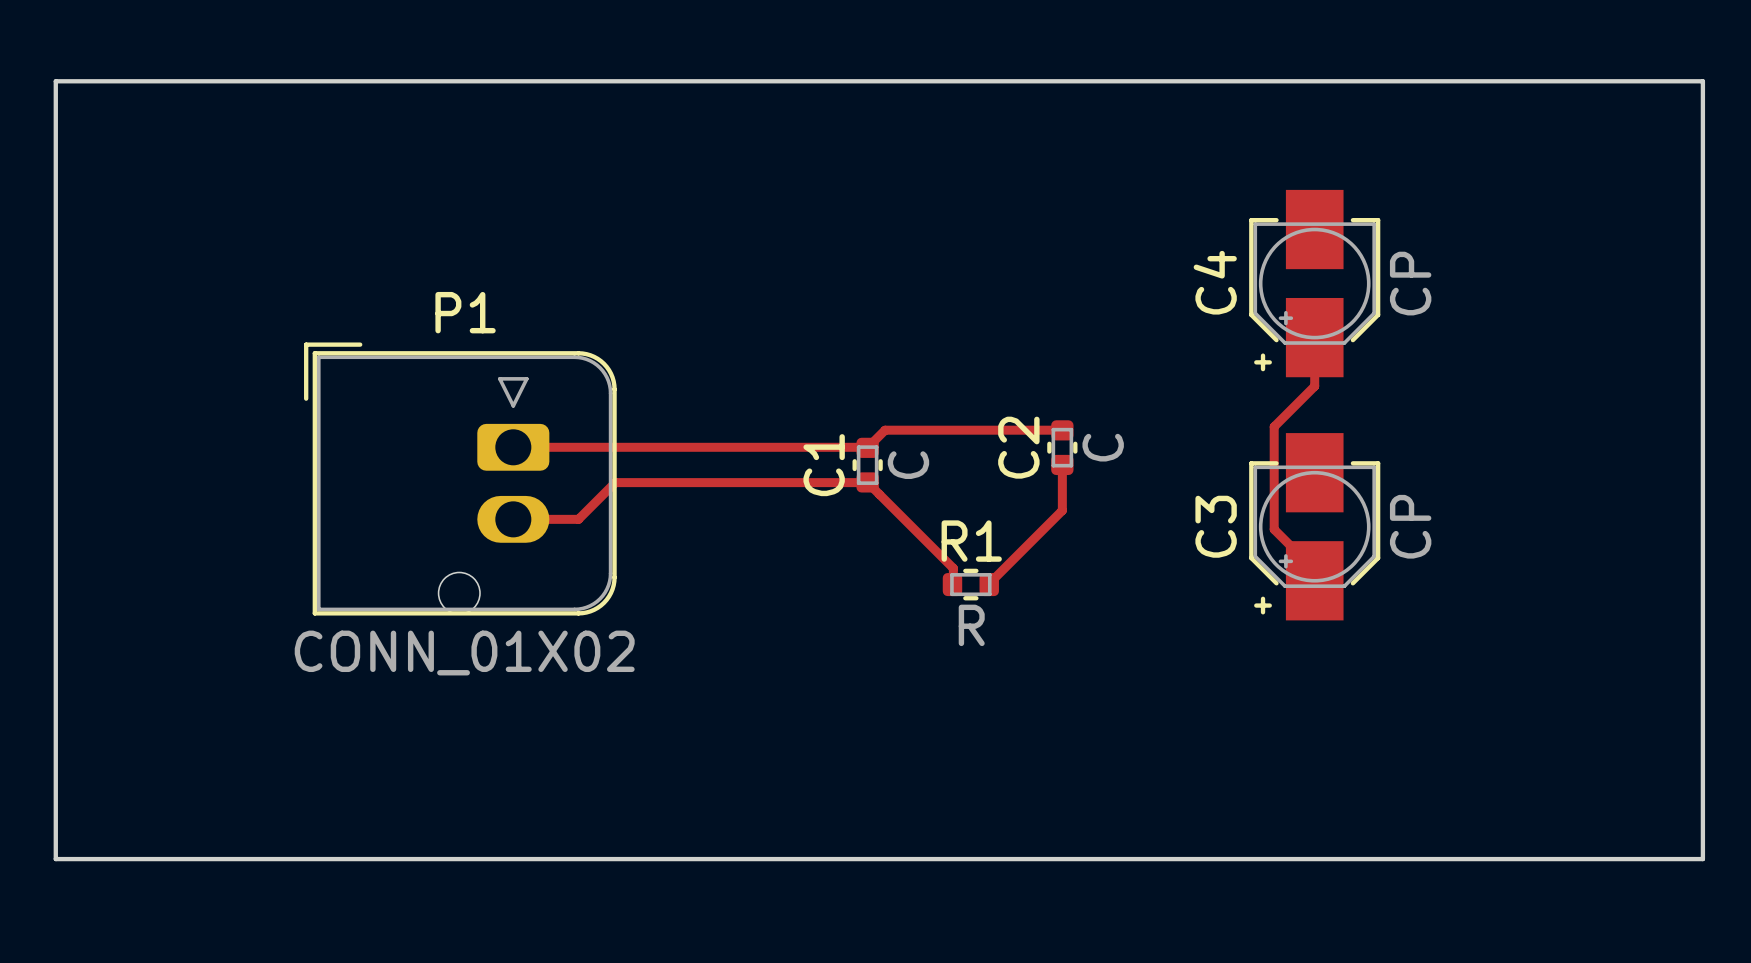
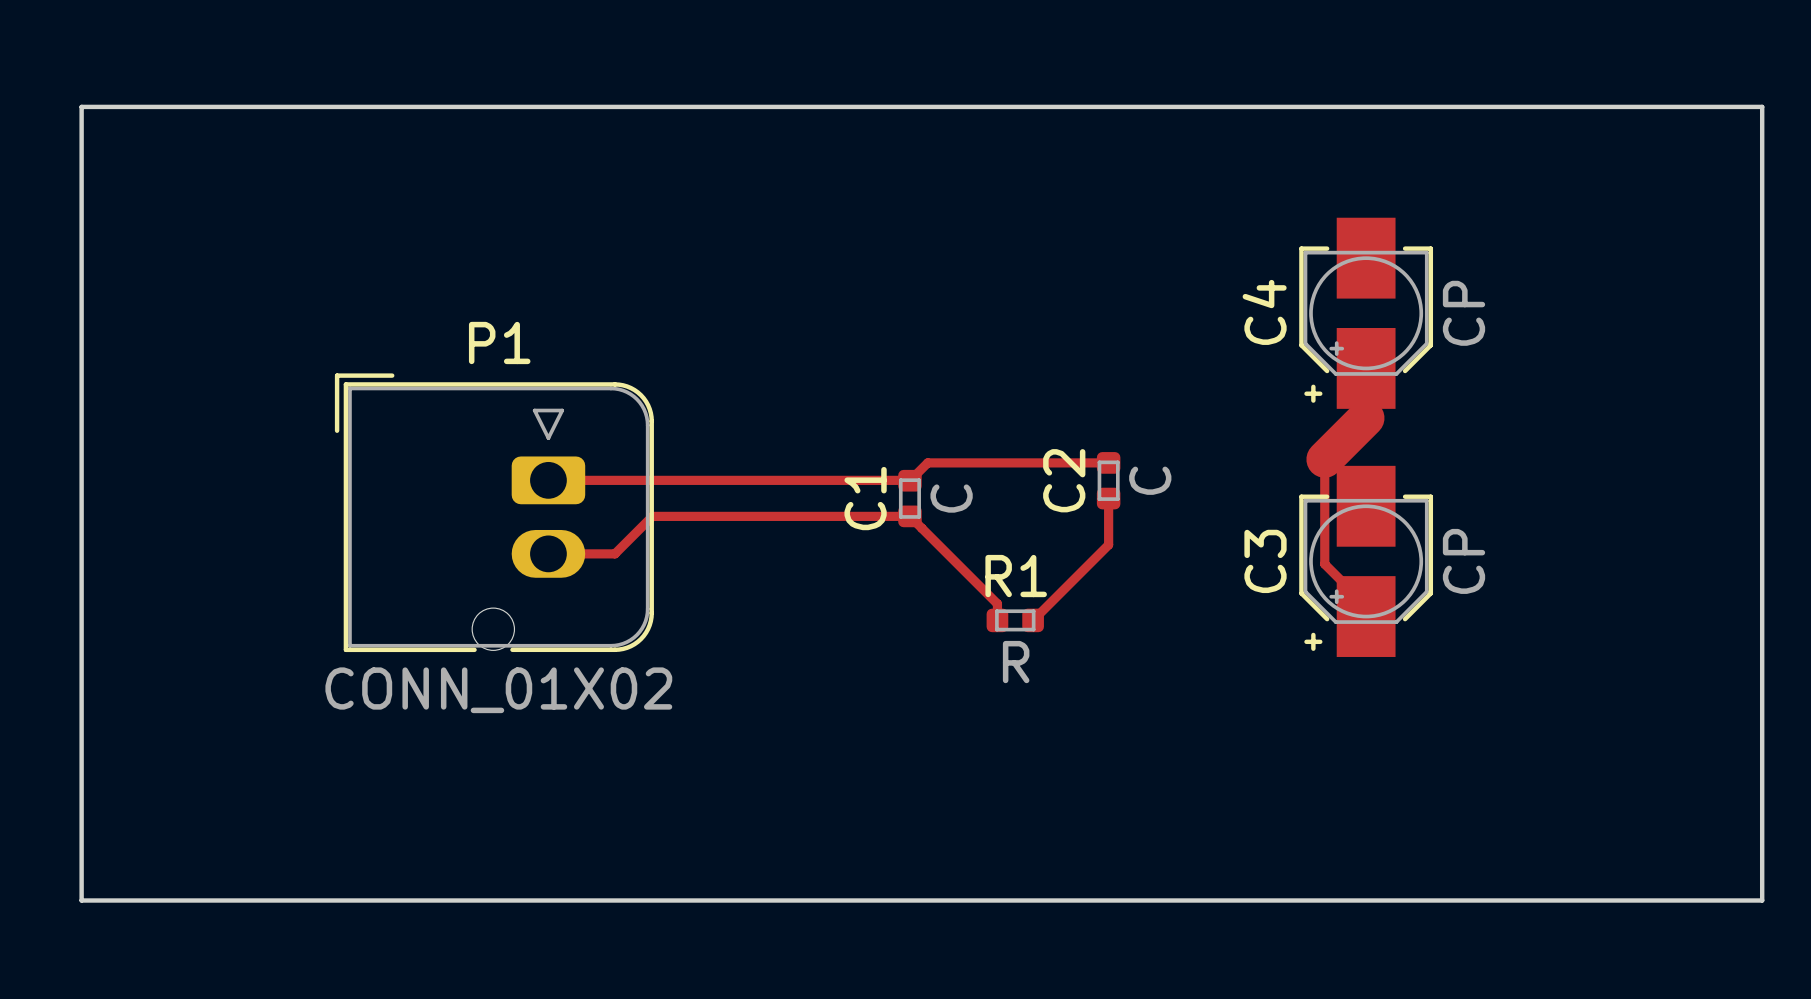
P1 footprint: [304, 342, 617, 616] -> [334, 373, 654, 653]
track width: thin (1314, 386) (1274, 426) -> thick (1366, 418) (1324, 459)
C2 footprint: [1047, 420, 1078, 476] -> [1096, 452, 1121, 510]
C1 footprint: [852, 437, 883, 493] -> [898, 469, 922, 528]
R1 footprint: [942, 568, 999, 601] -> [986, 608, 1044, 633]

